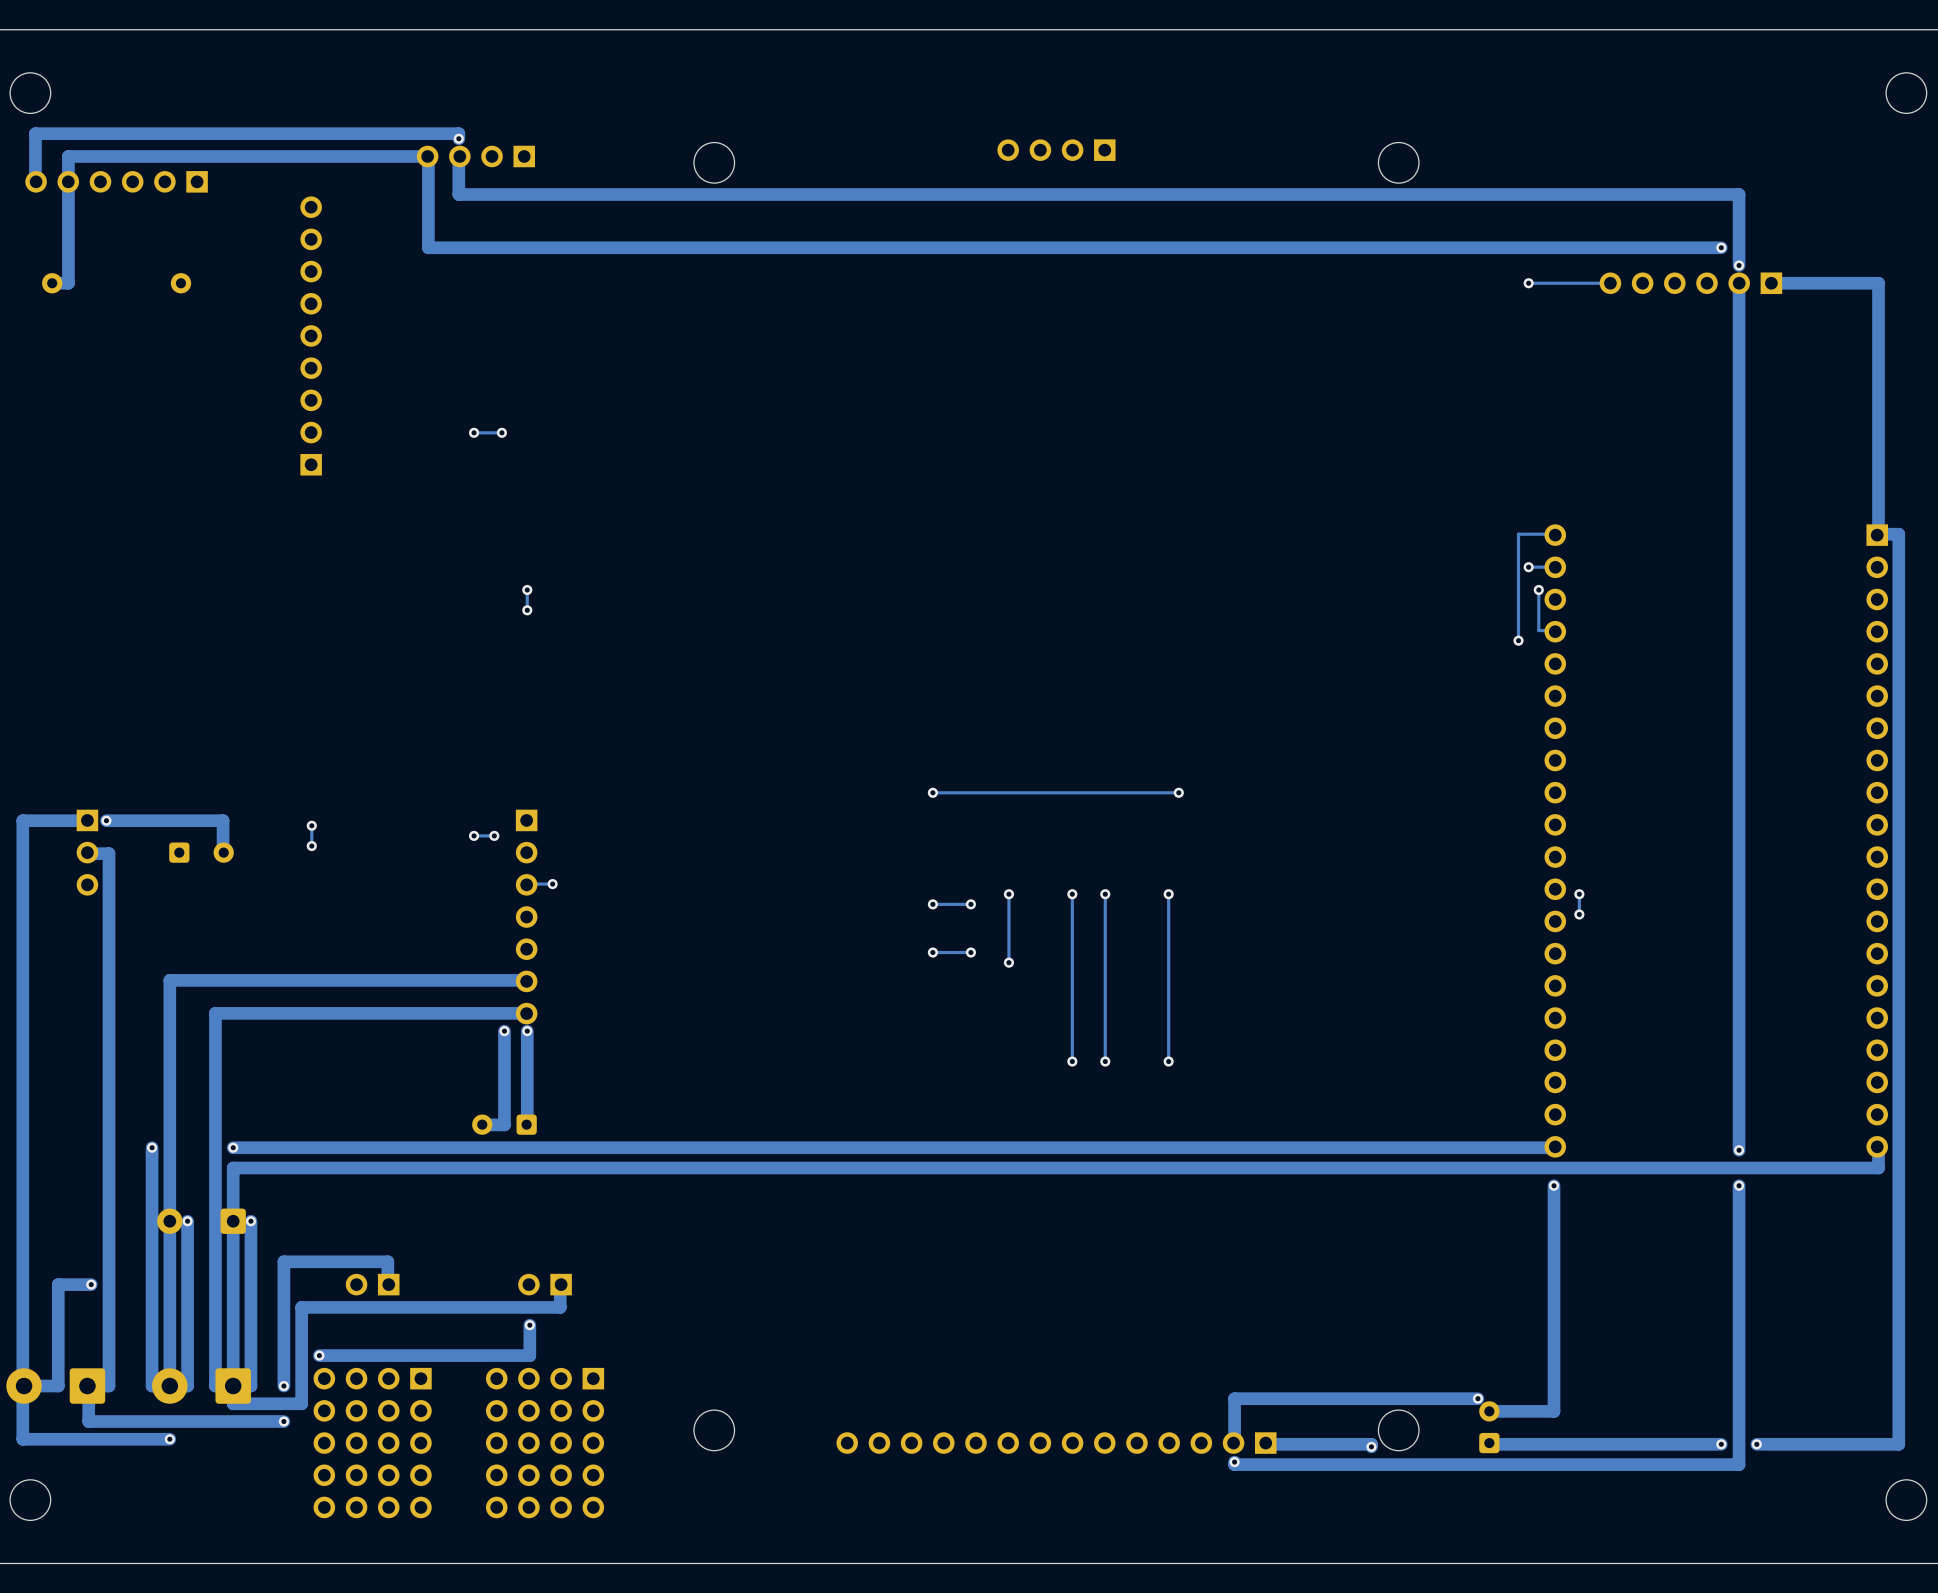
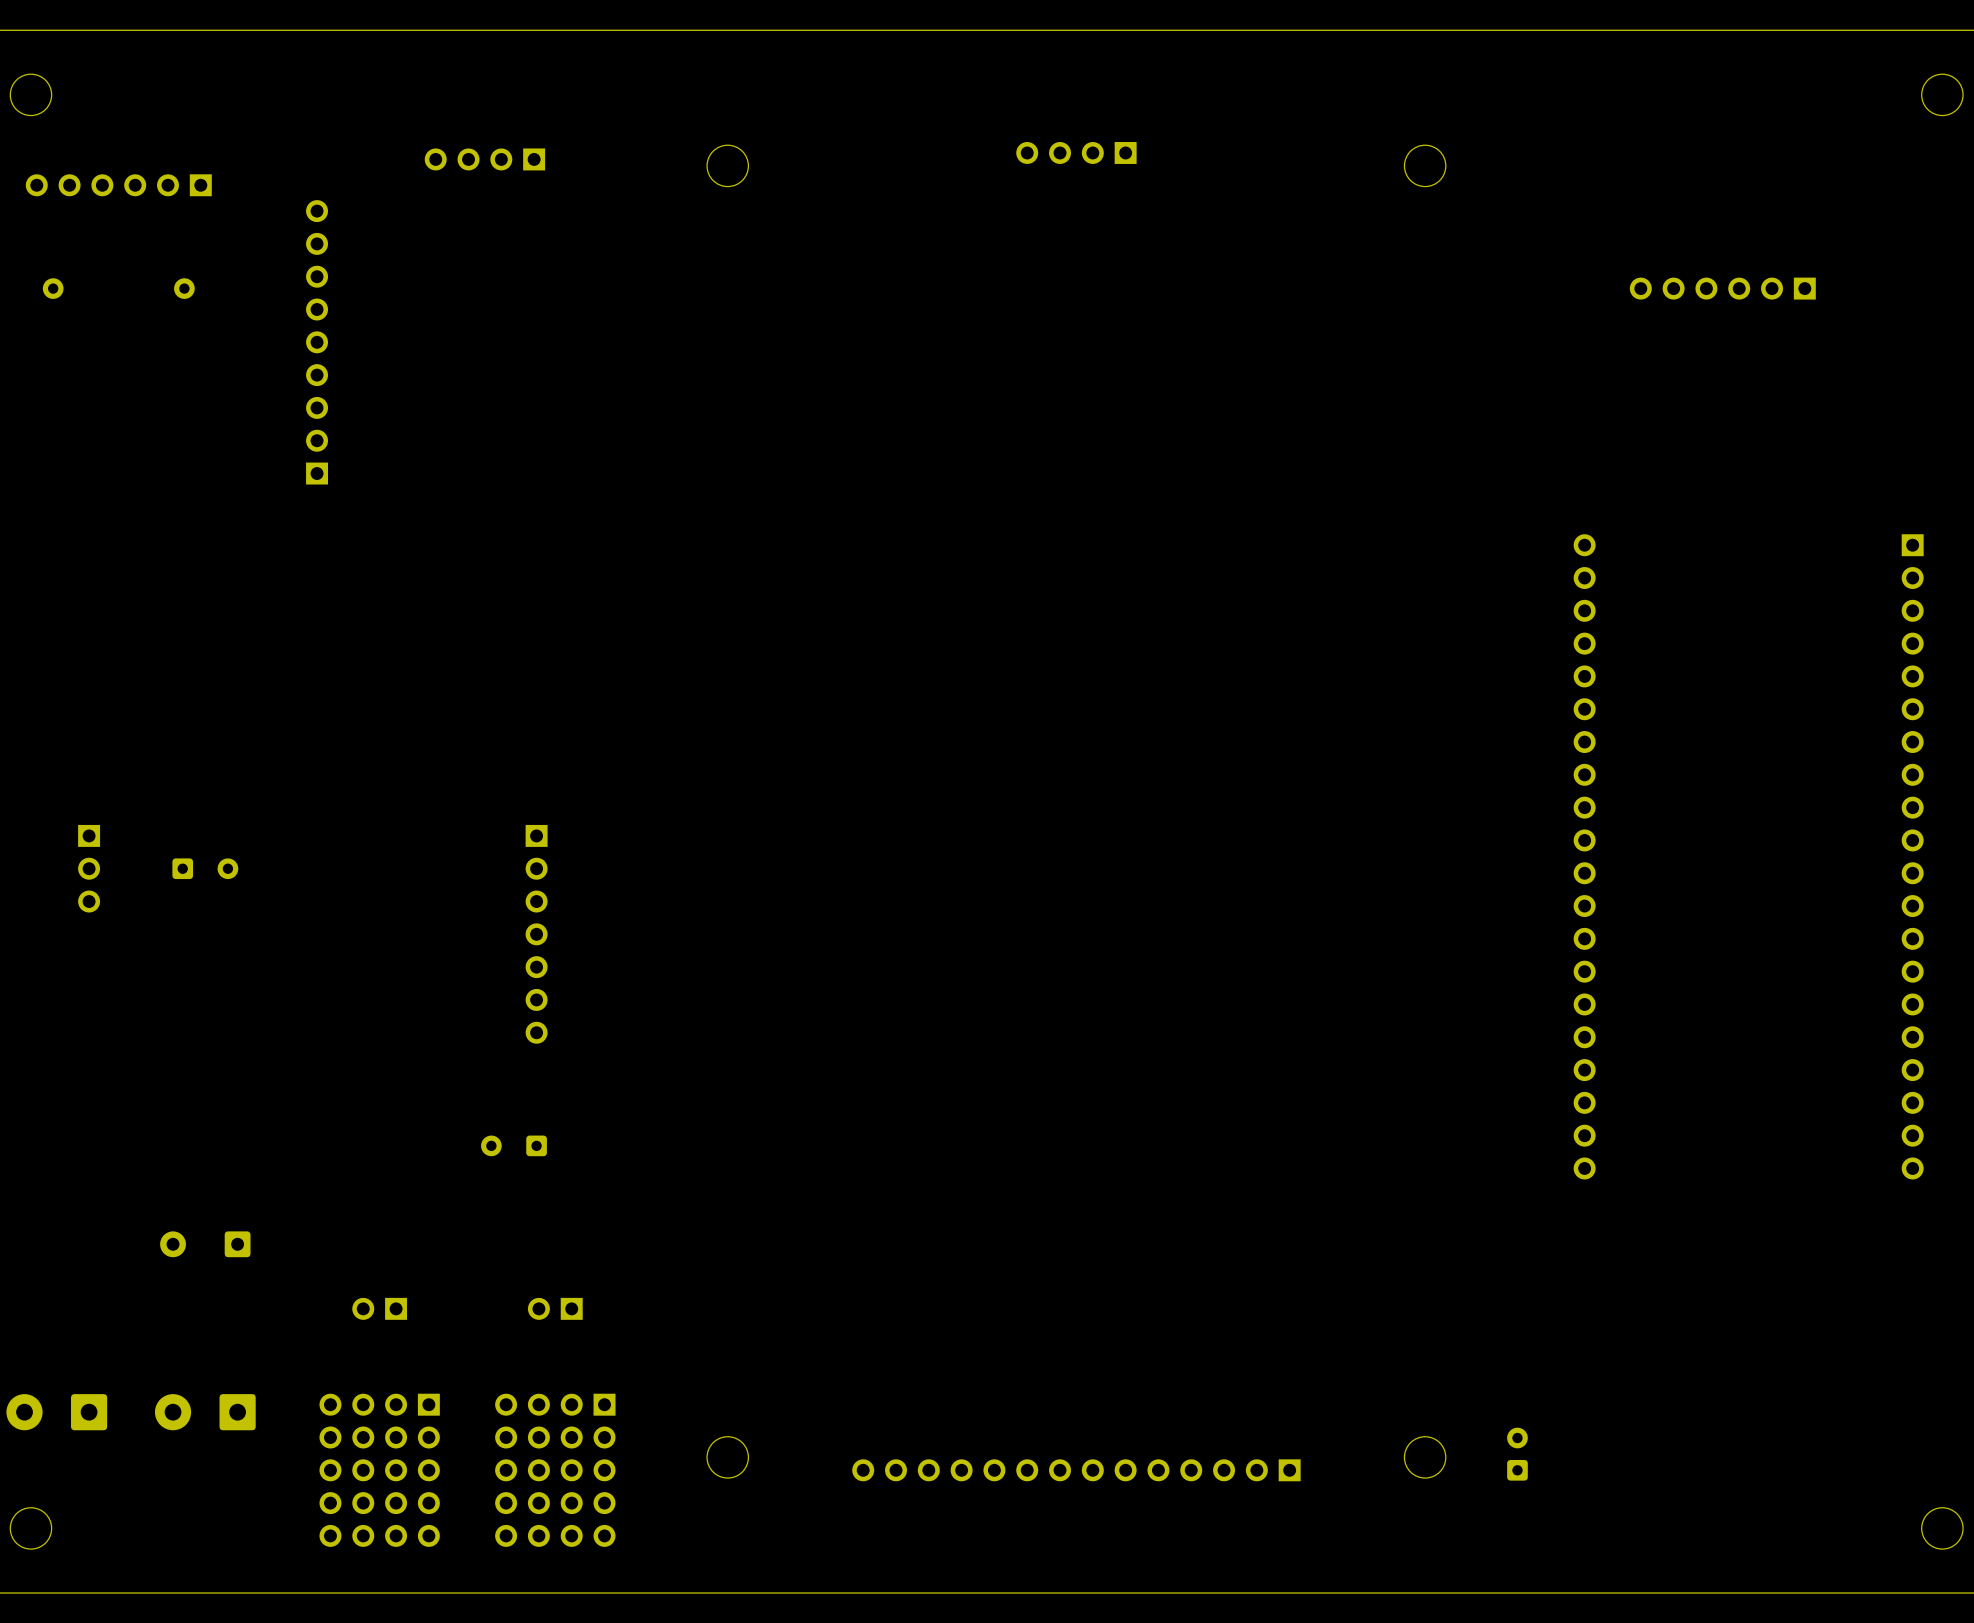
track: (458, 138) (458, 133) (35, 133) (36, 181) -> none
via: (458, 138) -> none
track: (459, 156) (458, 194) (1739, 194) (1739, 265) -> none
track: (1721, 247) (428, 247) (428, 156) (68, 156) (68, 283) (52, 283) -> none
via: (1721, 247) -> none
via: (1739, 265) -> none
via: (1528, 283) -> none
track: (1610, 283) (1528, 283) -> none
track: (1739, 283) (1739, 1150) -> none
track: (1771, 283) (1878, 283) (1878, 534) -> none
via: (474, 432) -> none
track: (501, 432) (474, 432) -> none
via: (501, 432) -> none
track: (1878, 534) (1898, 534) (1898, 1444) (1756, 1444) -> none
track: (1555, 535) (1518, 534) (1518, 640) -> none
track: (1528, 567) (1555, 567) -> none
via: (1528, 567) -> none
track: (527, 589) (527, 610) -> none
via: (527, 589) -> none
track: (1538, 589) (1538, 630) (1555, 631) -> none
via: (1538, 589) -> none
via: (527, 610) -> none
via: (1518, 640) -> none
via: (932, 792) -> none
track: (1178, 792) (932, 792) -> none
via: (1178, 792) -> none
track: (87, 820) (22, 820) (22, 1439) (169, 1439) -> none
track: (106, 820) (223, 820) (223, 852) -> none
via: (106, 820) -> none
track: (311, 825) (311, 846) -> none
via: (311, 825) -> none
via: (474, 835) -> none
track: (494, 835) (474, 835) -> none
via: (494, 835) -> none
via: (311, 846) -> none
track: (87, 852) (108, 853) (108, 1386) (87, 1386) -> none
track: (552, 884) (526, 884) -> none
via: (552, 884) -> none
track: (1008, 894) (1008, 962) -> none
via: (1008, 894) -> none
track: (1072, 894) (1072, 1061) -> none
via: (1072, 894) -> none
track: (1105, 894) (1105, 1061) -> none
via: (1105, 894) -> none
track: (1168, 894) (1168, 1061) -> none
via: (1168, 894) -> none
track: (1579, 894) (1579, 914) -> none
via: (1579, 894) -> none
via: (932, 904) -> none
track: (970, 904) (932, 904) -> none
via: (970, 904) -> none
via: (1579, 914) -> none
via: (932, 952) -> none
track: (970, 952) (932, 952) -> none
via: (970, 952) -> none
via: (1008, 962) -> none
track: (526, 981) (169, 980) (169, 1386) -> none
track: (526, 1013) (215, 1013) (215, 1386) (250, 1386) (250, 1221) -> none
track: (504, 1031) (504, 1124) (482, 1124) -> none
via: (504, 1031) -> none
track: (527, 1031) (526, 1124) -> none
via: (527, 1031) -> none
via: (1072, 1061) -> none
via: (1105, 1061) -> none
via: (1168, 1061) -> none
track: (1555, 1146) (233, 1147) -> none
track: (1877, 1146) (1878, 1168) (233, 1168) (233, 1403) (301, 1403) (301, 1307) (560, 1307) (561, 1284) -> none
track: (152, 1147) (152, 1386) (187, 1386) (187, 1221) -> none
via: (152, 1147) -> none
via: (233, 1147) -> none
via: (1739, 1150) -> none
track: (1554, 1185) (1554, 1411) (1489, 1411) -> none
via: (1554, 1185) -> none
track: (1739, 1185) (1739, 1464) (1234, 1464) (1234, 1462) -> none
via: (1739, 1185) -> none
via: (187, 1221) -> none
via: (250, 1221) -> none
track: (91, 1284) (58, 1284) (58, 1386) (22, 1386) -> none
via: (91, 1284) -> none
track: (388, 1284) (387, 1261) (283, 1261) (283, 1386) -> none
track: (529, 1325) (529, 1355) (319, 1355) -> none
via: (529, 1325) -> none
via: (319, 1355) -> none
track: (88, 1386) (88, 1421) (283, 1421) -> none
via: (283, 1386) -> none
track: (1477, 1398) (1234, 1398) (1234, 1444) (1233, 1443) -> none
via: (1477, 1398) -> none
via: (283, 1421) -> none
via: (169, 1439) -> none
track: (1265, 1443) (1371, 1444) (1371, 1446) -> none
track: (1489, 1443) (1721, 1444) -> none
via: (1721, 1444) -> none
via: (1756, 1444) -> none
via: (1371, 1446) -> none
via: (1234, 1462) -> none

